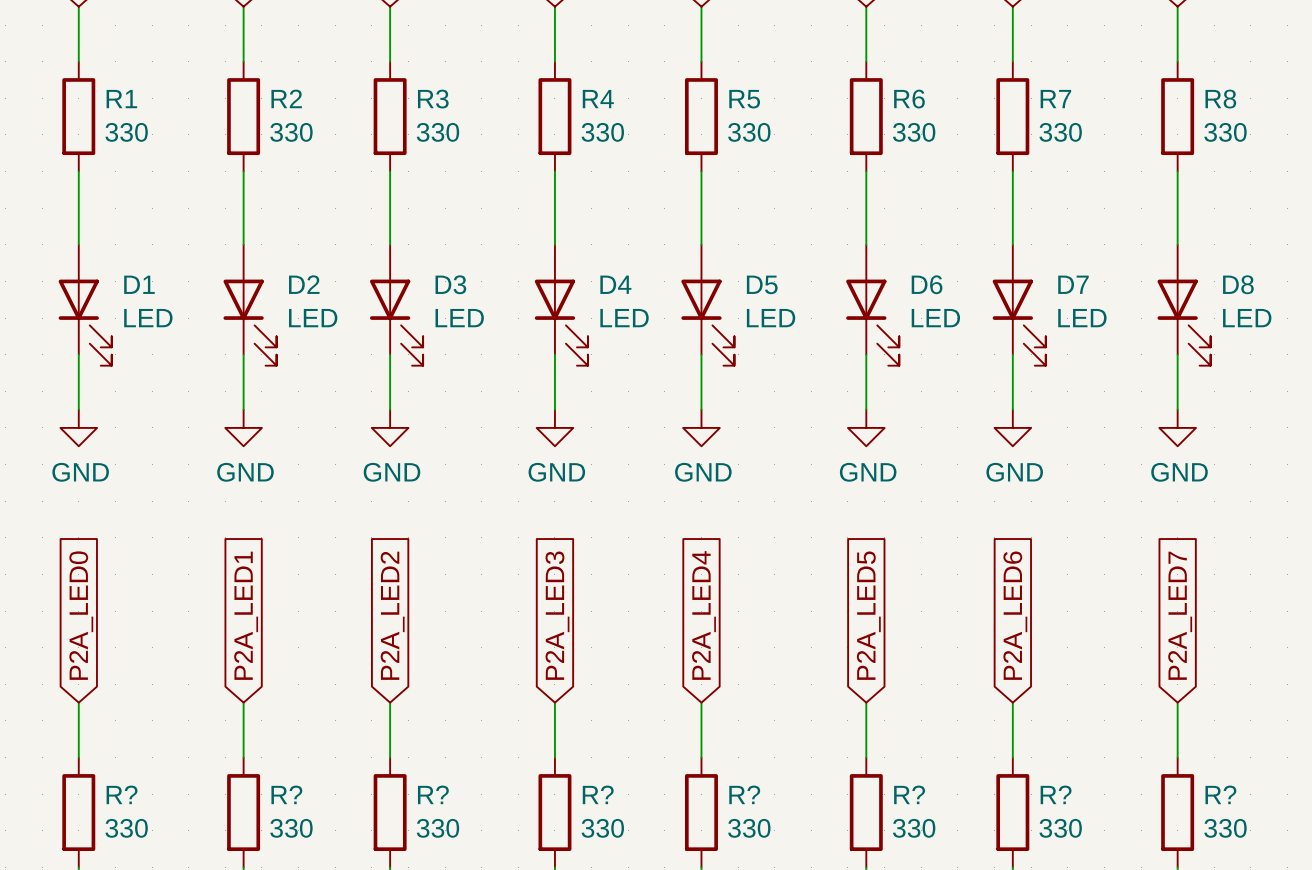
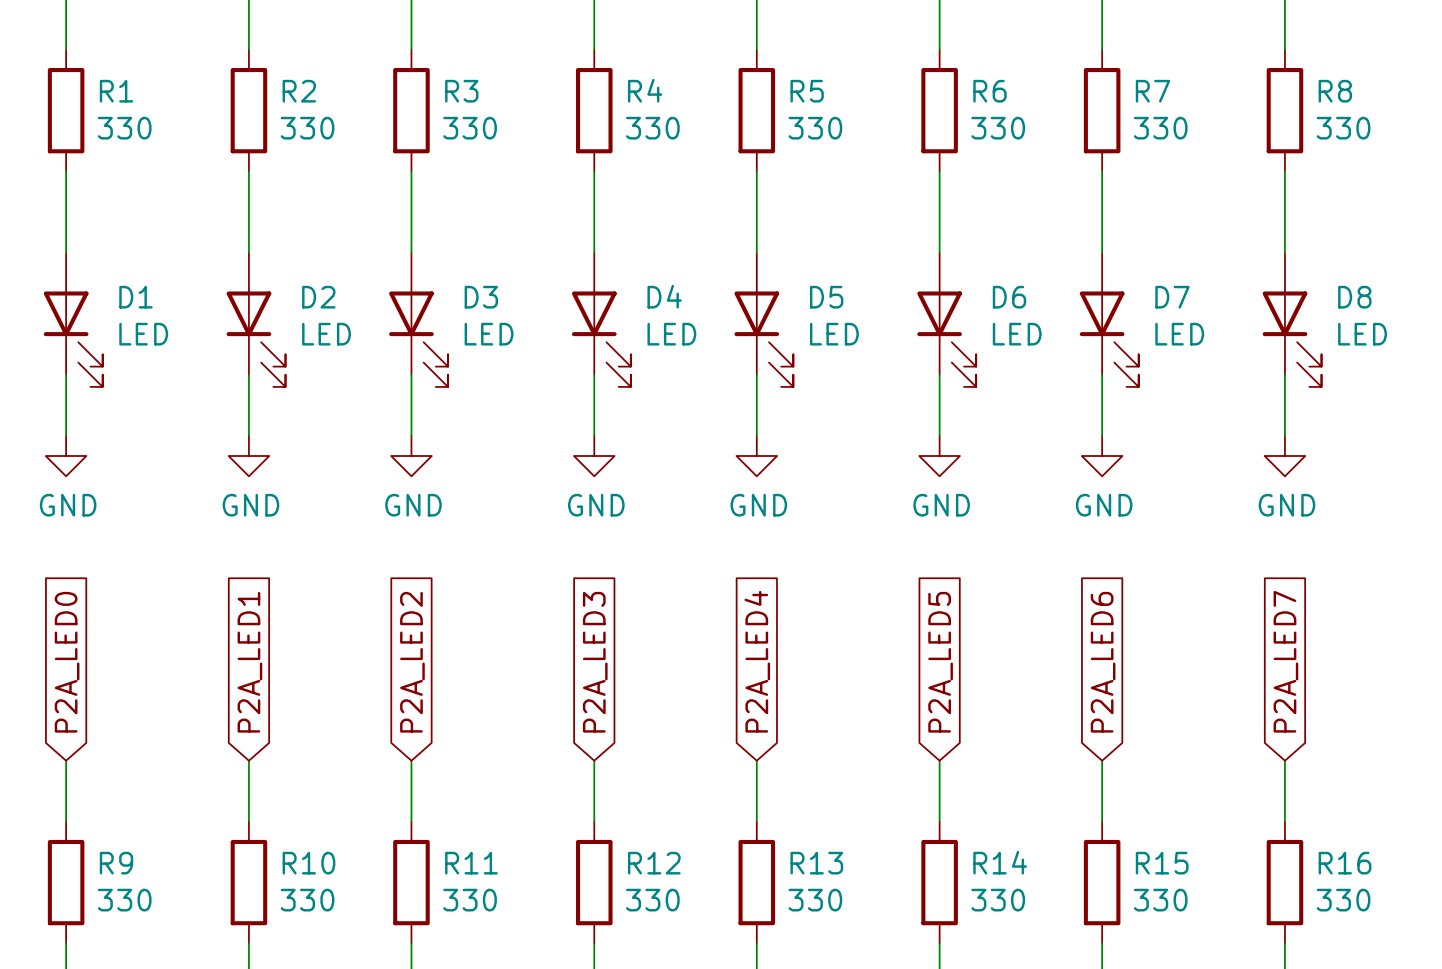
R? name: R? (122, 794) -> R9 (116, 863)
R? name: R? (286, 794) -> R10 (308, 863)
R? name: R? (433, 794) -> R11 (471, 863)
R? name: R? (598, 794) -> R12 (654, 863)
R? name: R? (744, 794) -> R13 (816, 863)
R? name: R? (909, 794) -> R14 (1000, 862)
R? name: R? (1056, 794) -> R15 (1162, 863)
R? name: R? (1220, 794) -> R16 (1344, 863)

